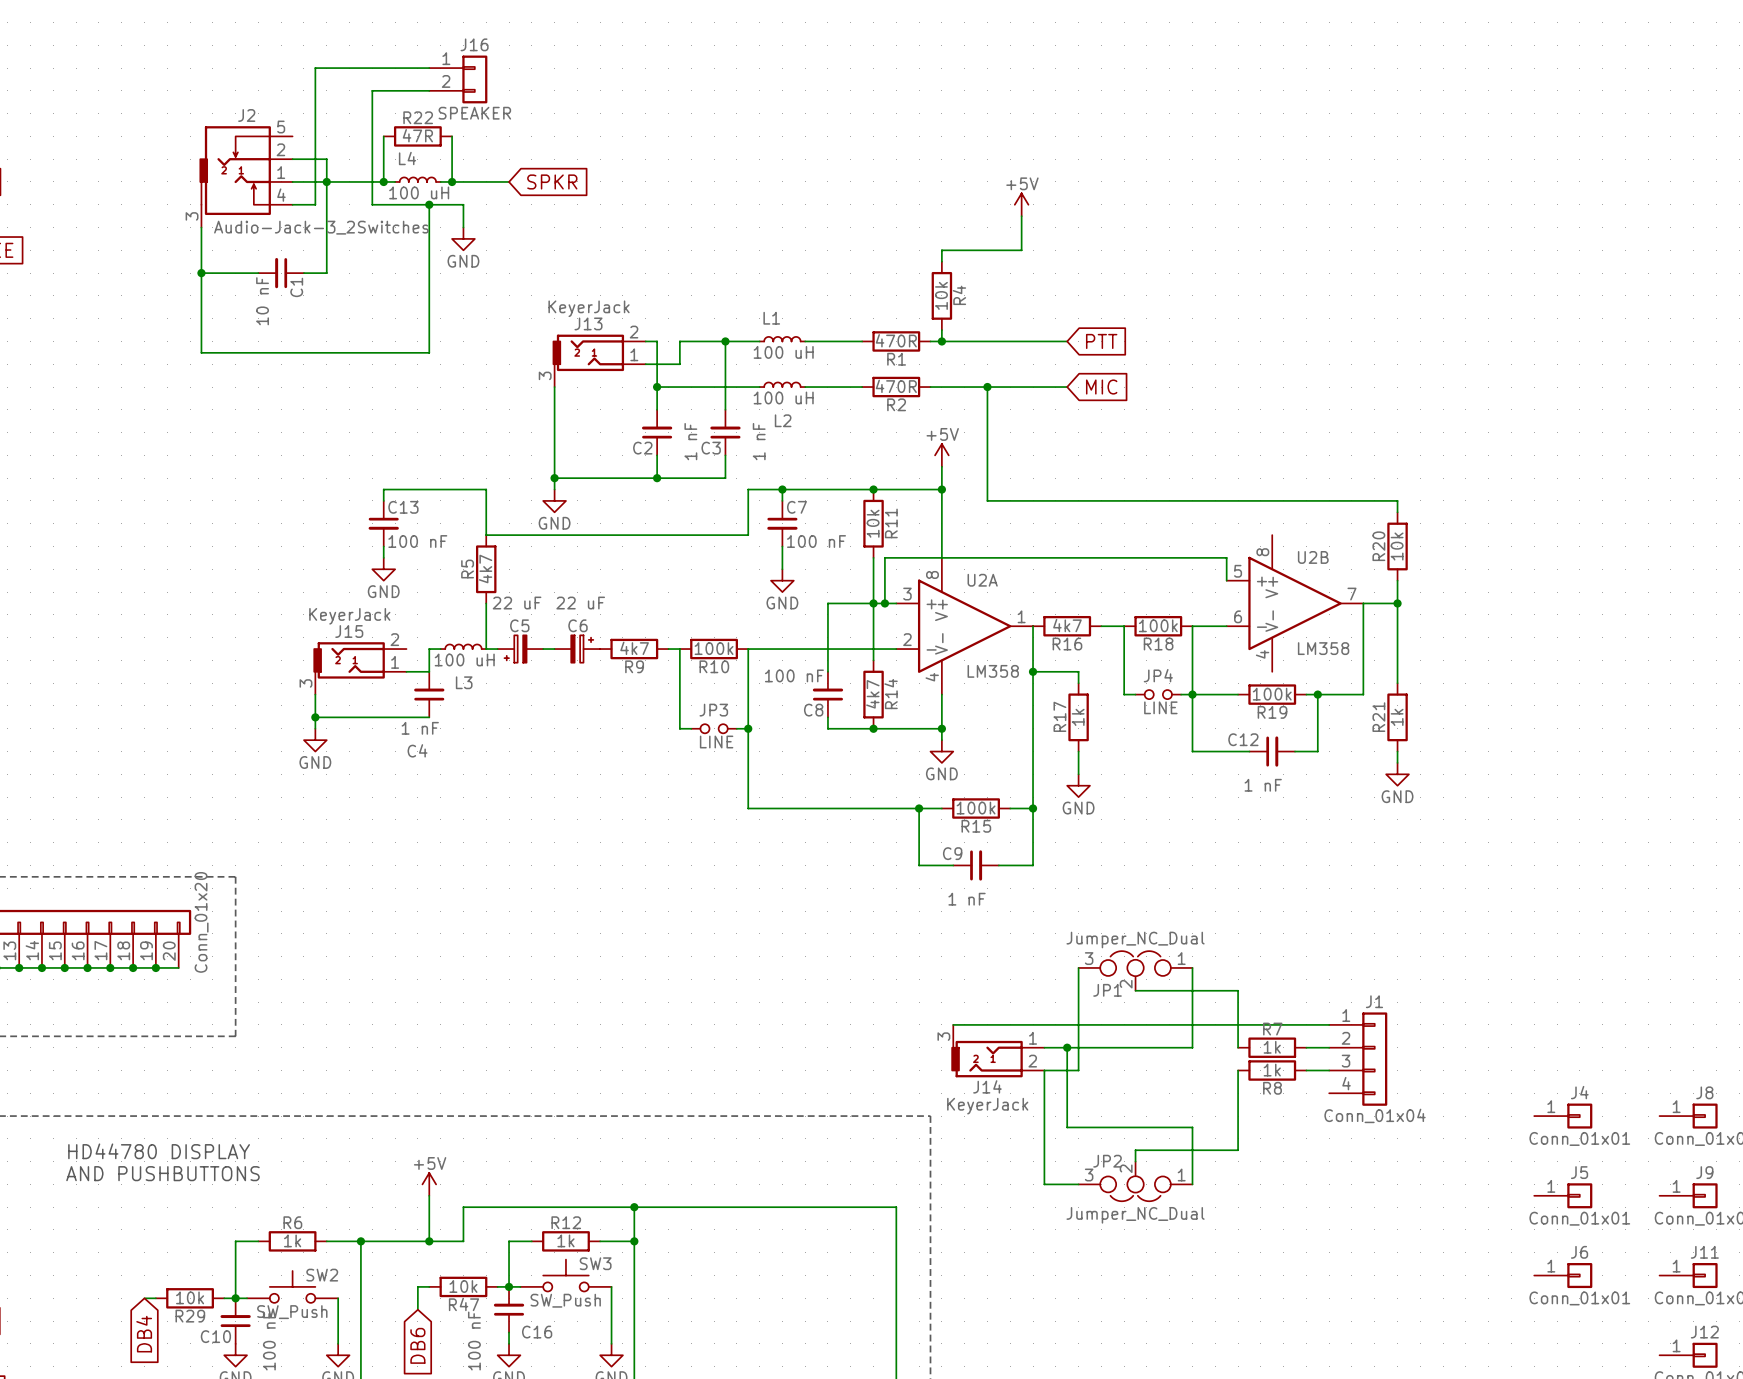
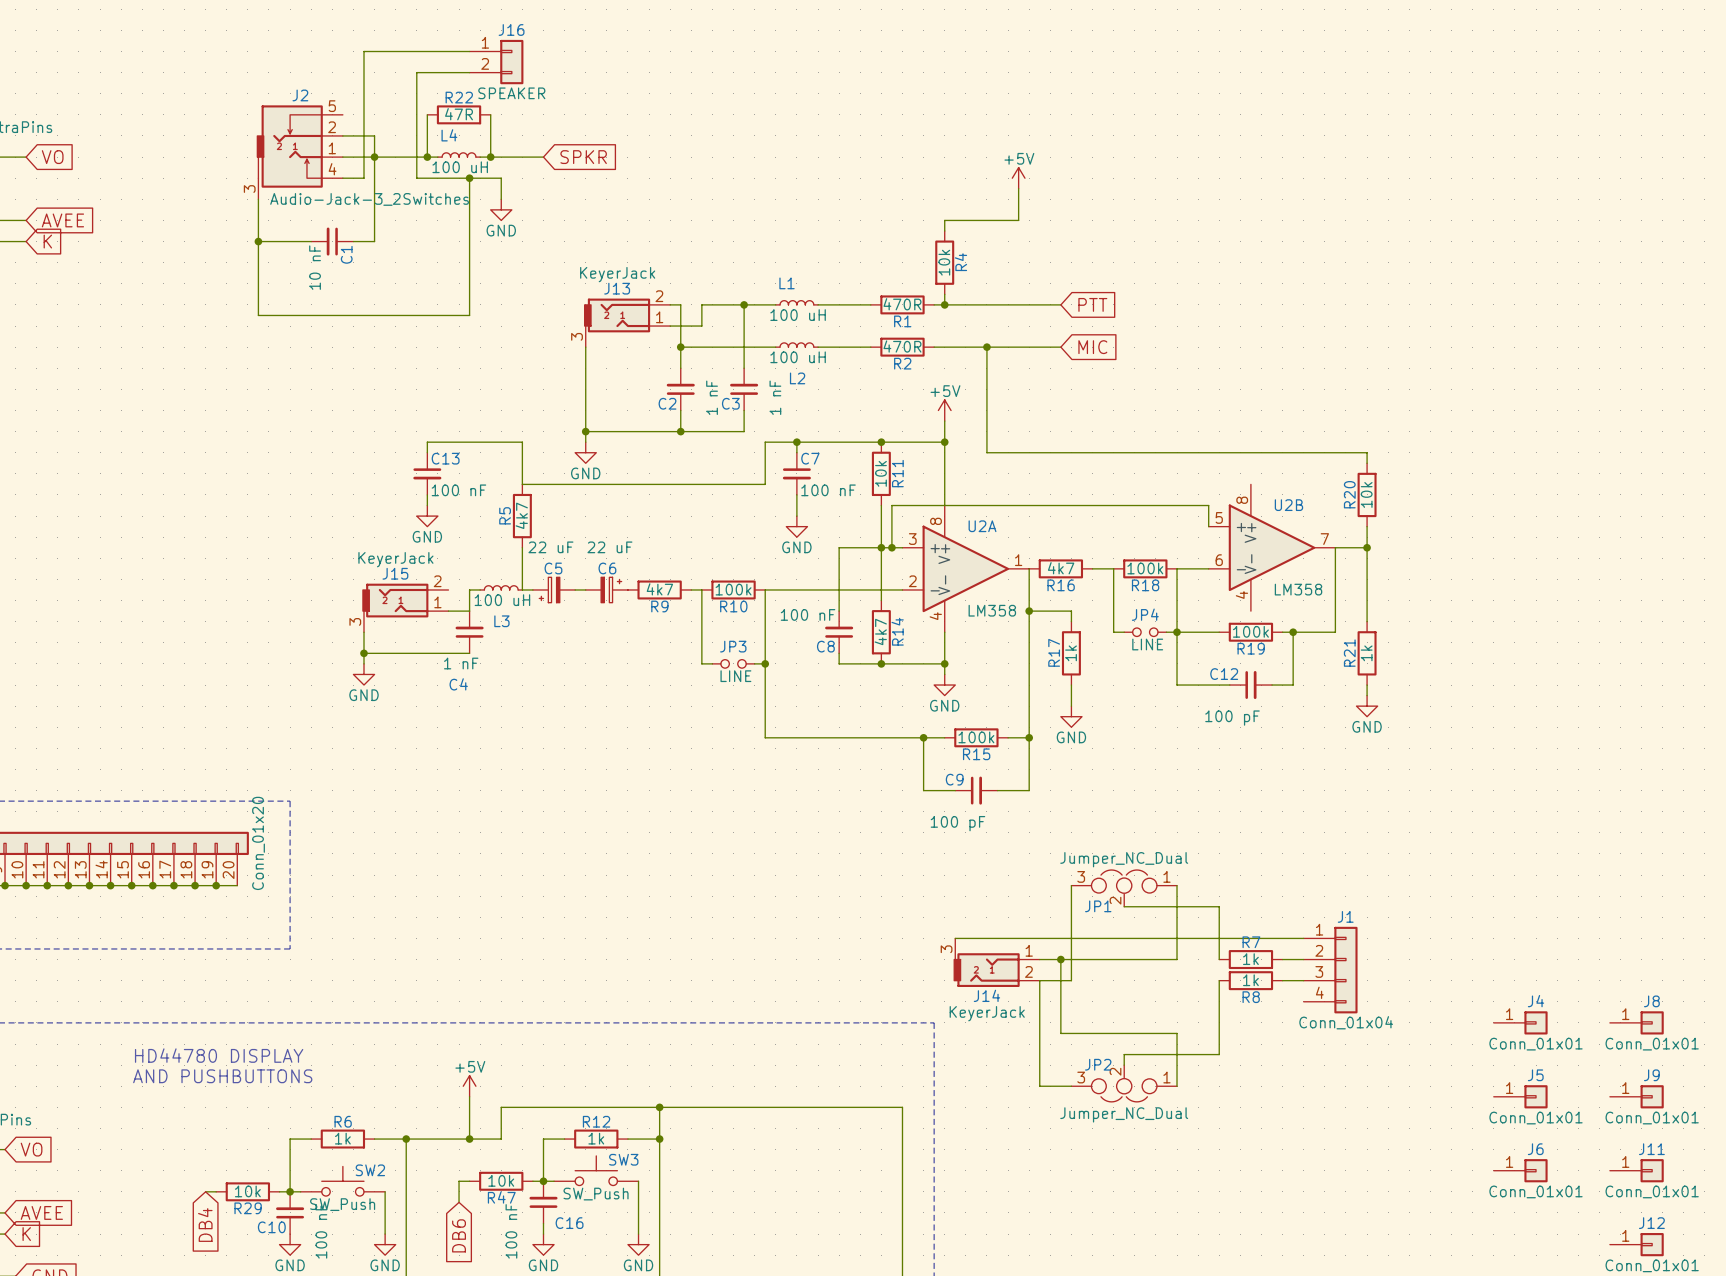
C12 value: 1 nF (1263, 785) -> 100 pF (1232, 718)
C9 value: 1 nF (967, 899) -> 100 pF (957, 823)

